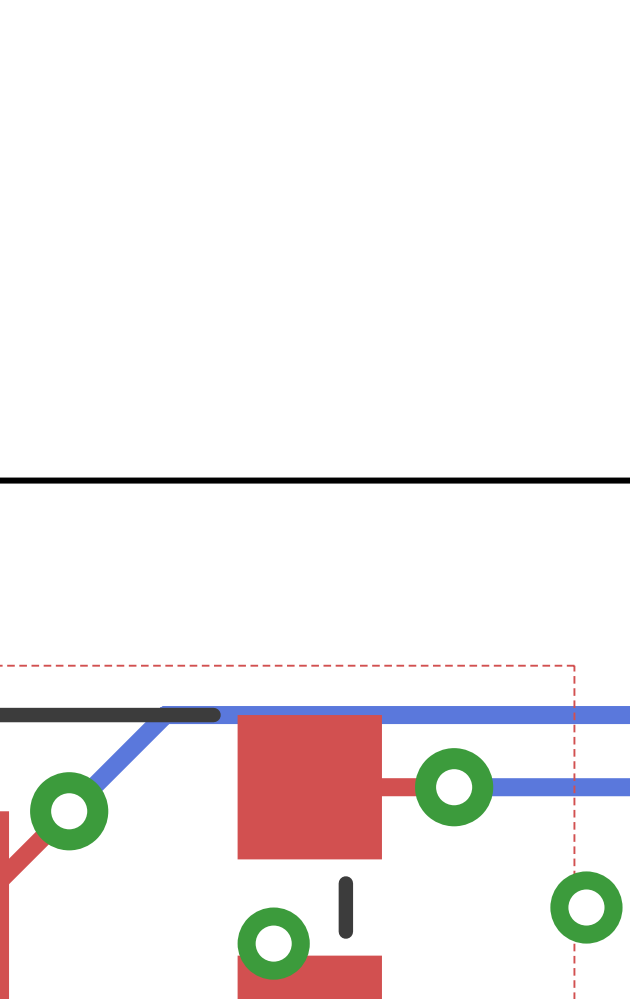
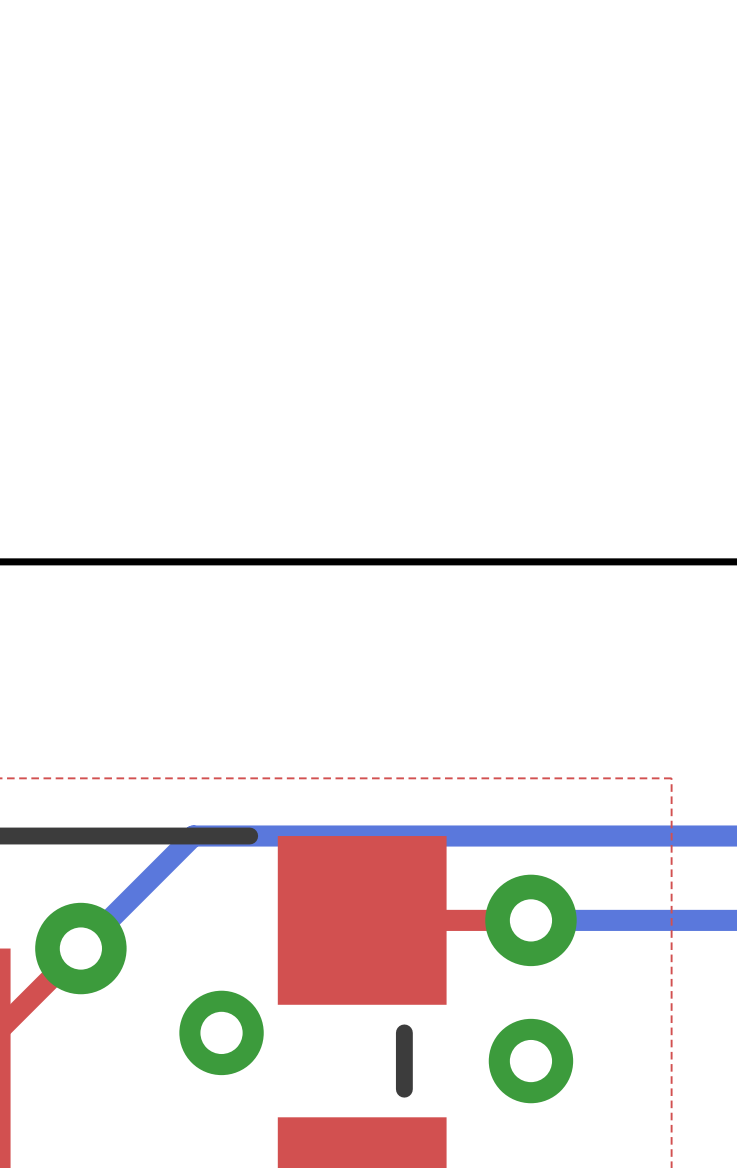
via: none -> (221, 1032)
via: none -> (530, 1061)
via: (586, 907) -> none
via: (273, 943) -> none

